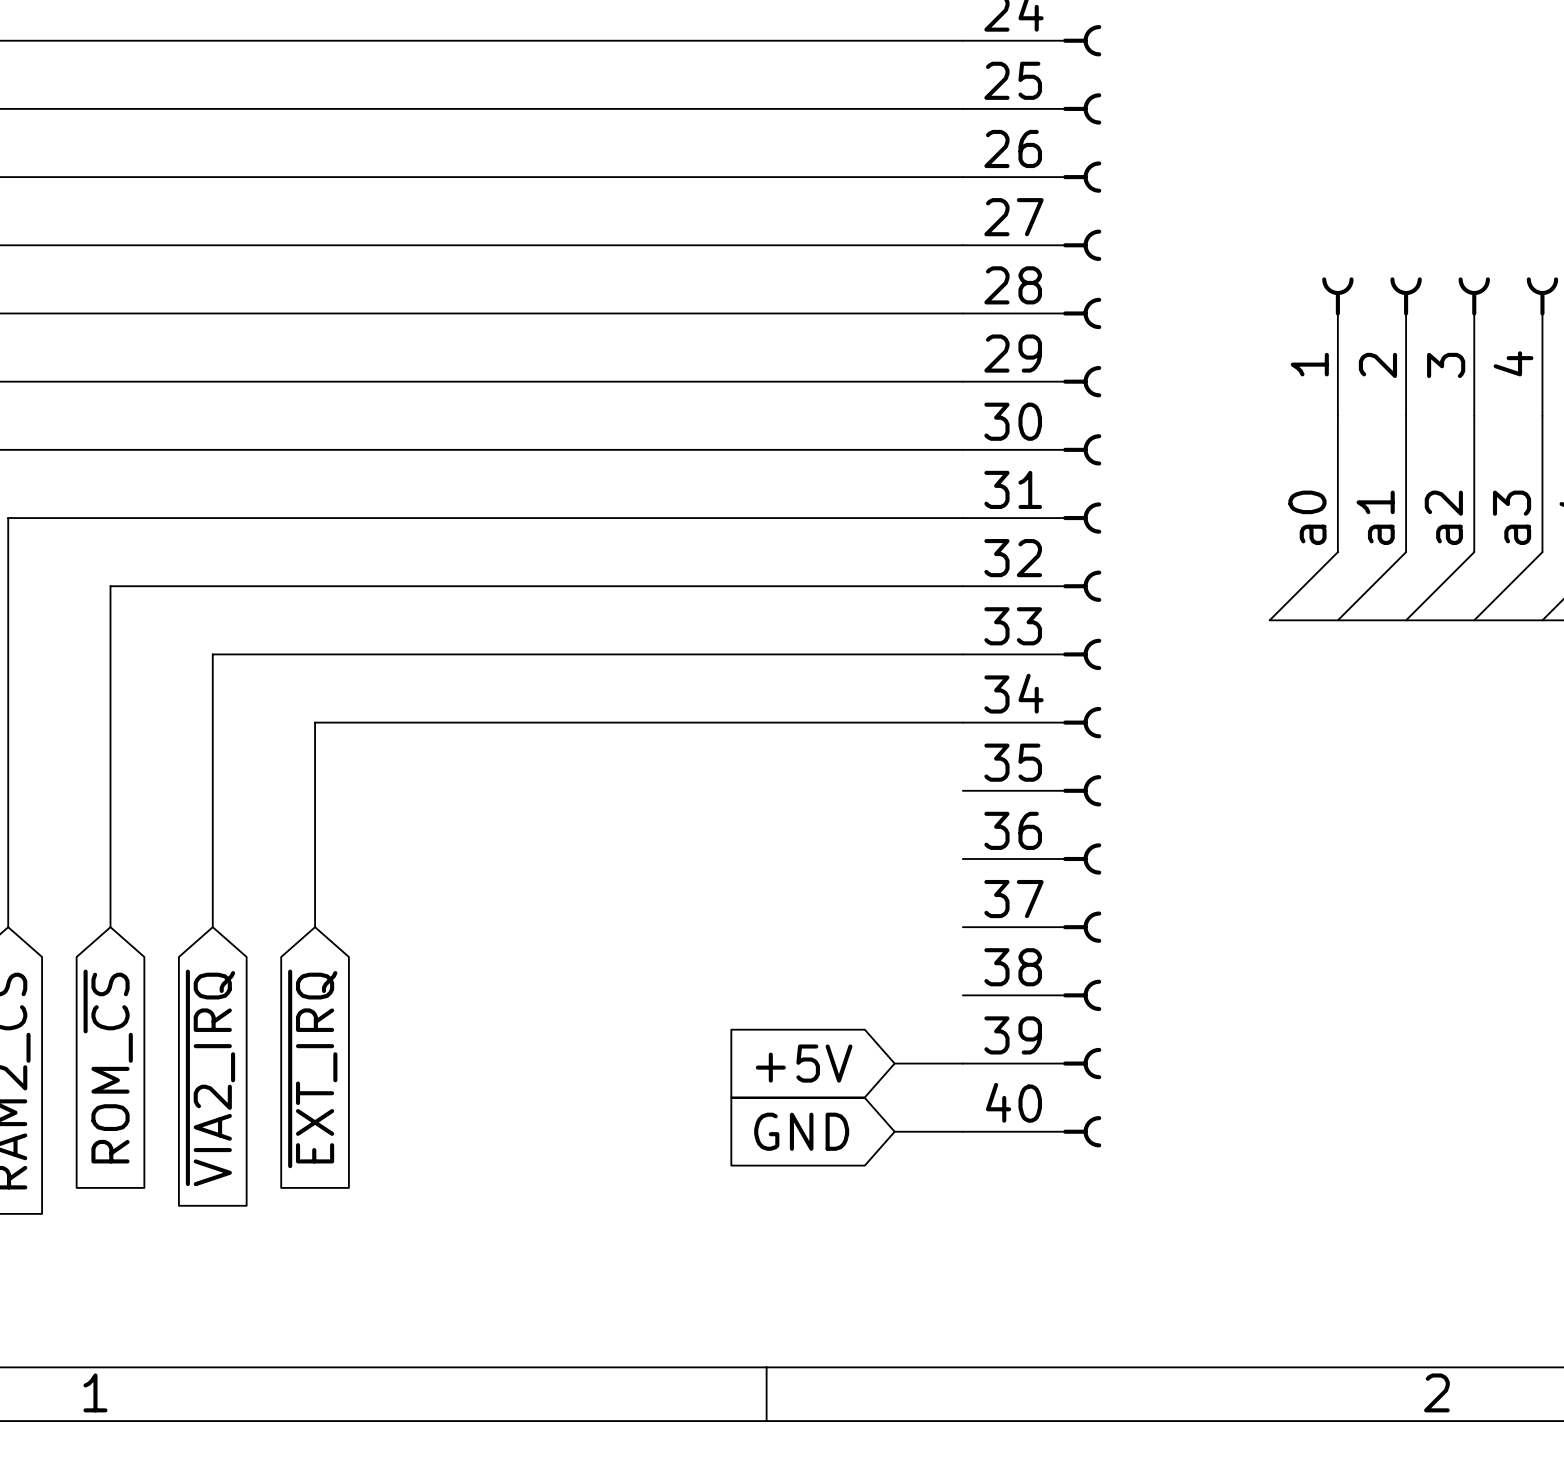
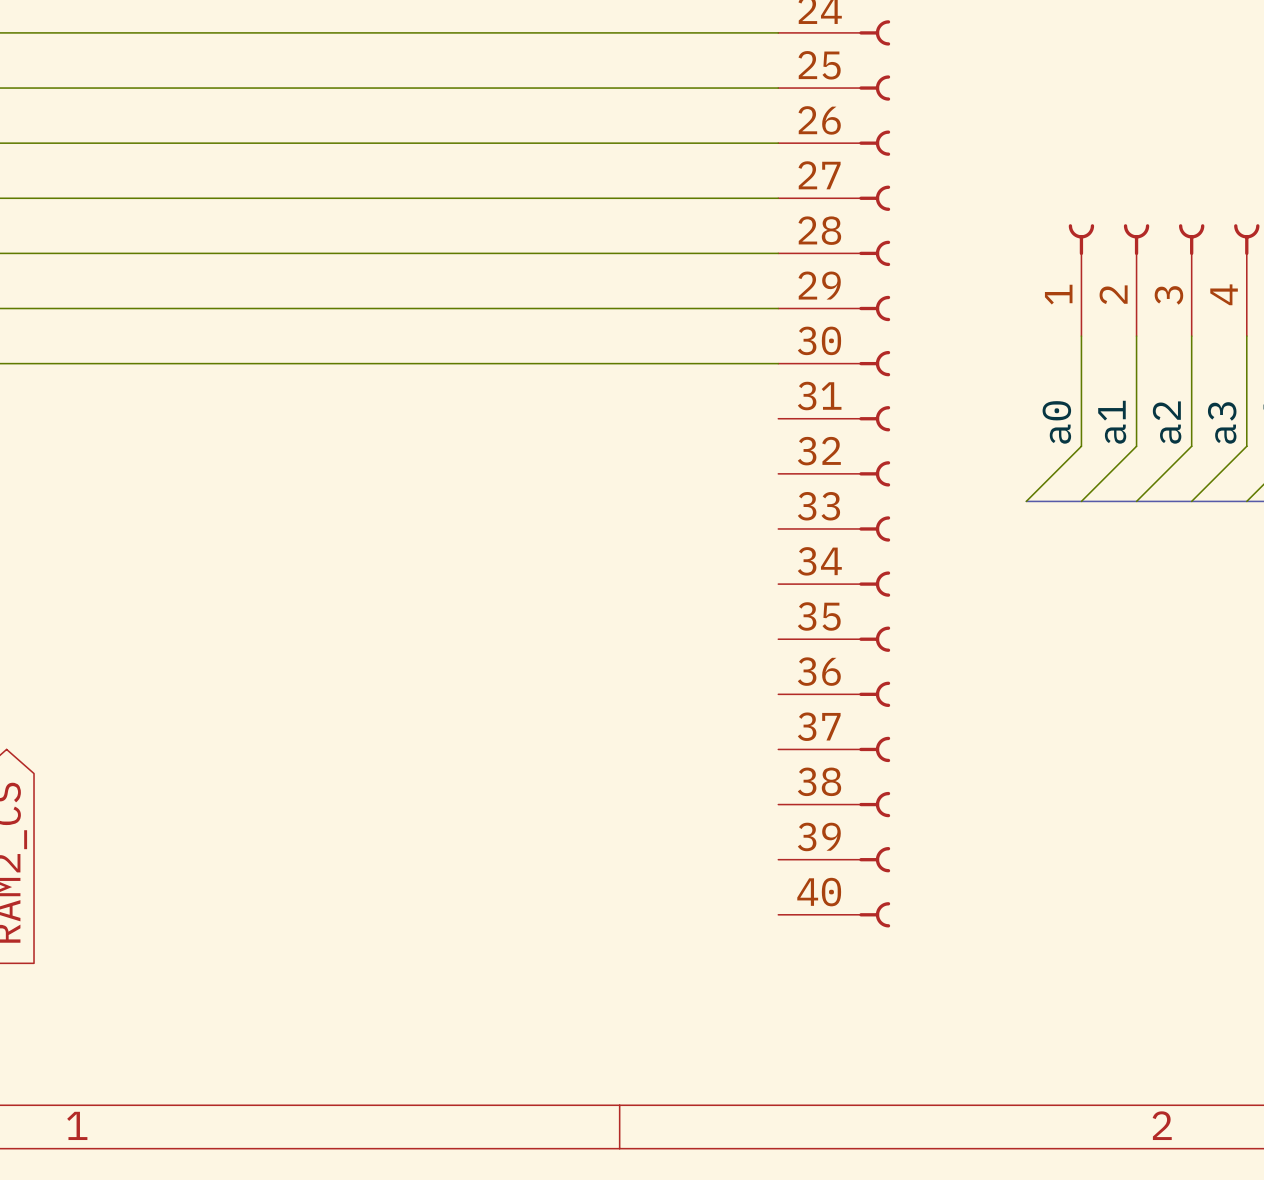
wire: (962, 518) (8, 518) (8, 927) -> none
wire: (962, 586) (110, 586) (110, 927) -> none
wire: (962, 654) (212, 654) (212, 927) -> none
wire: (962, 722) (315, 722) (315, 927) -> none
global label: +5V (804, 1063) -> none
wire: (894, 1063) (962, 1063) -> none
global label: ROM_~{CS} (108, 1066) -> none
global label: ~{EXT_IRQ} (312, 1068) -> none
global label: ~{VIA2_IRQ} (210, 1077) -> none
global label: GND (801, 1131) -> none
wire: (894, 1131) (962, 1131) -> none

